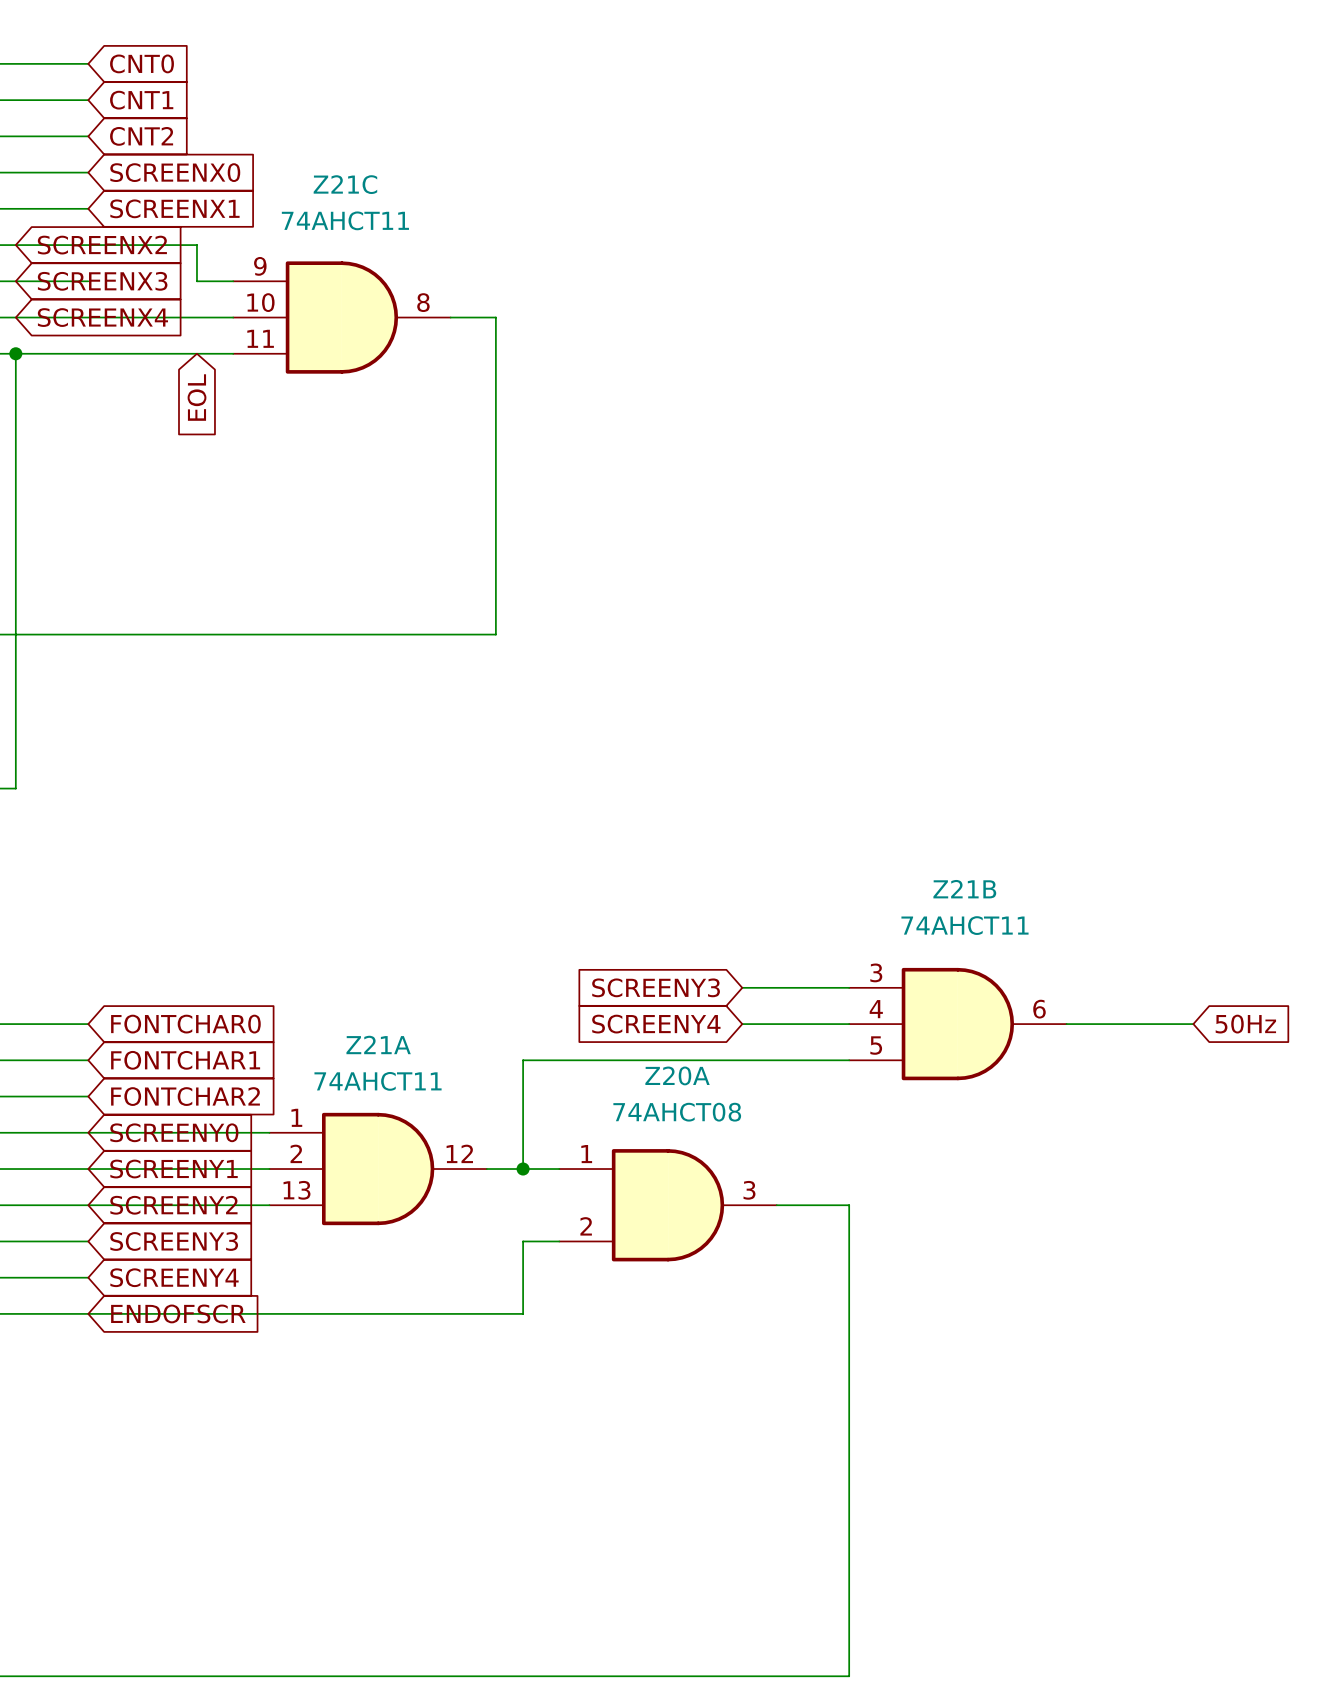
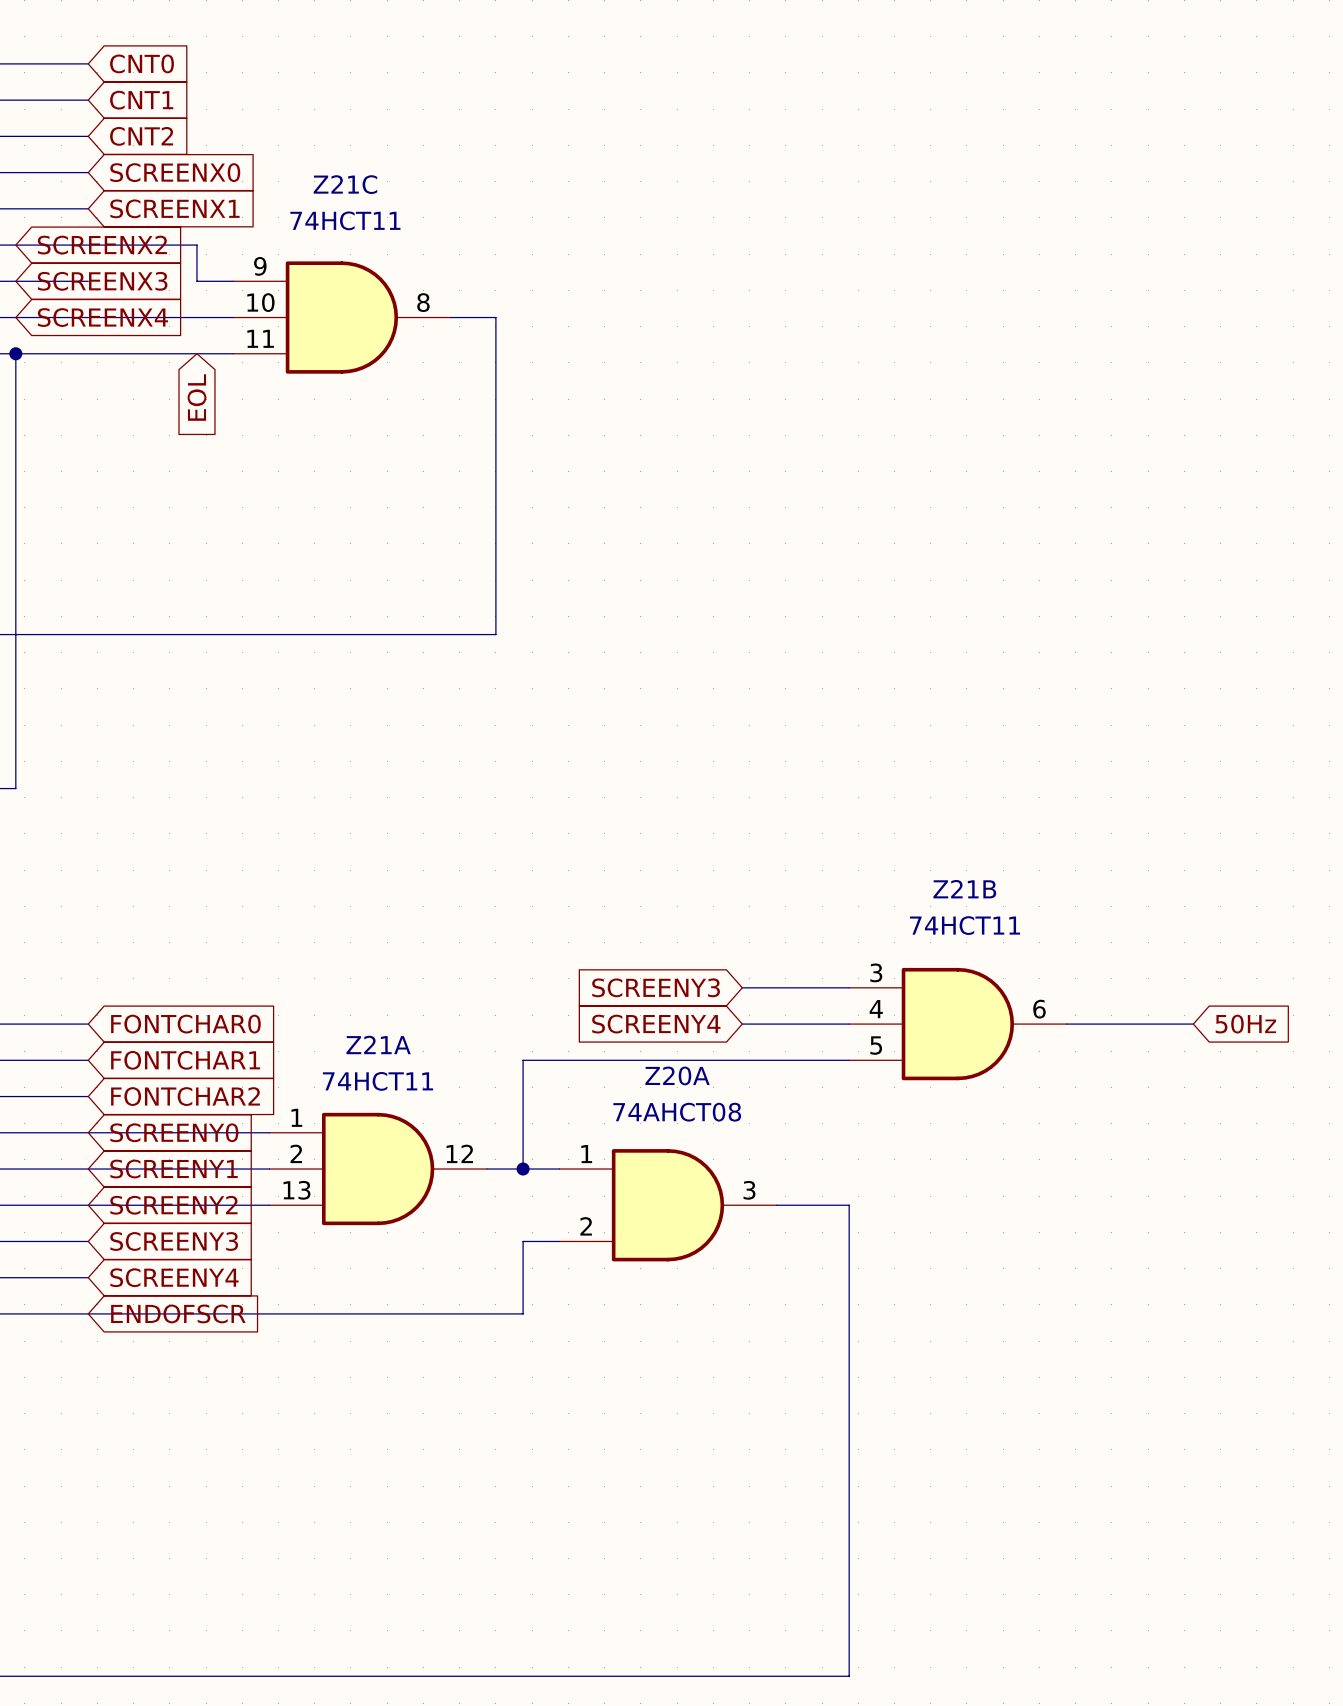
Z21C value: 74AHCT11 (345, 220) -> 74HCT11 (345, 220)
Z21B value: 74AHCT11 (964, 925) -> 74HCT11 (964, 925)
Z21A value: 74AHCT11 (378, 1081) -> 74HCT11 (378, 1081)

